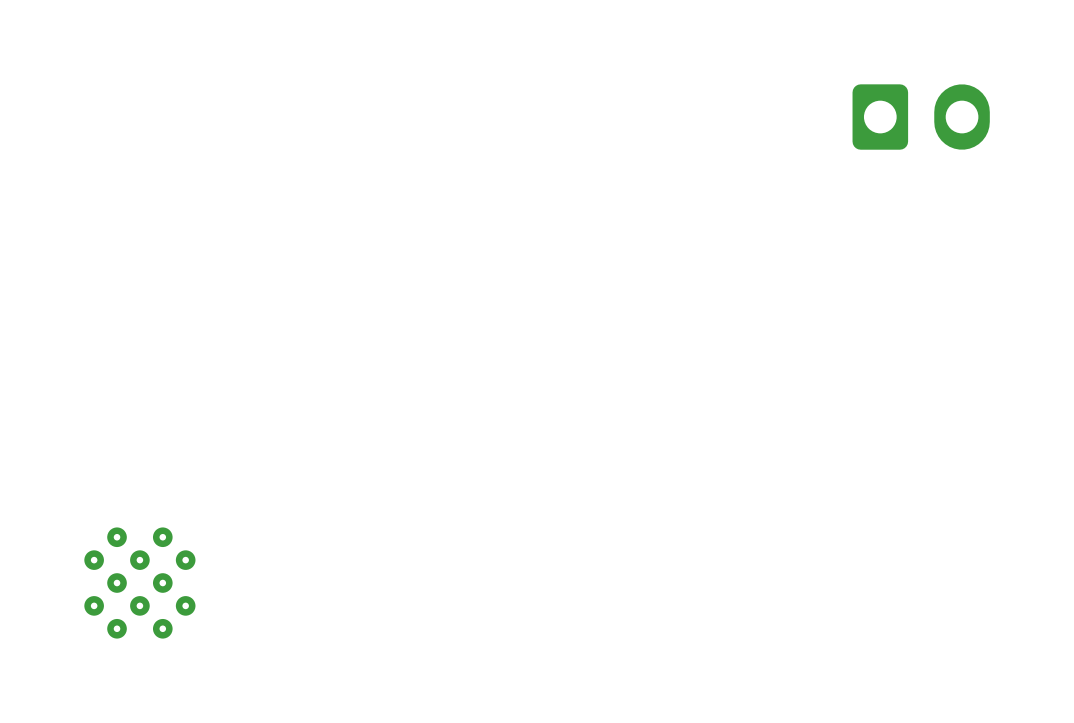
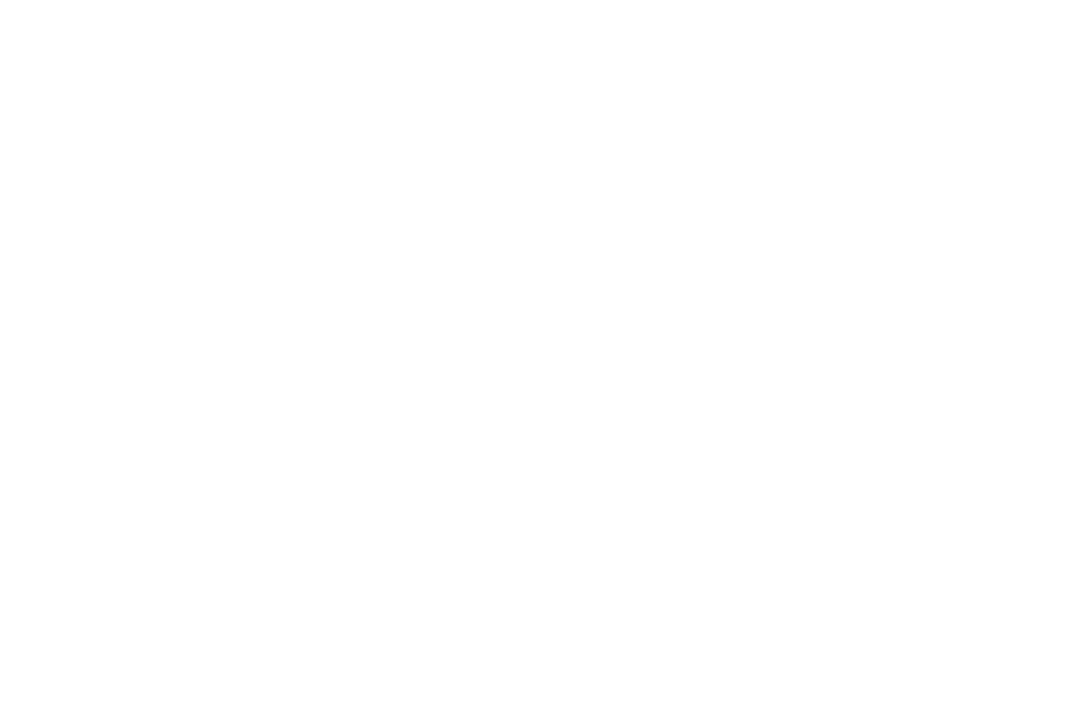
part: (921, 117) -> none
part: (139, 583) -> none

